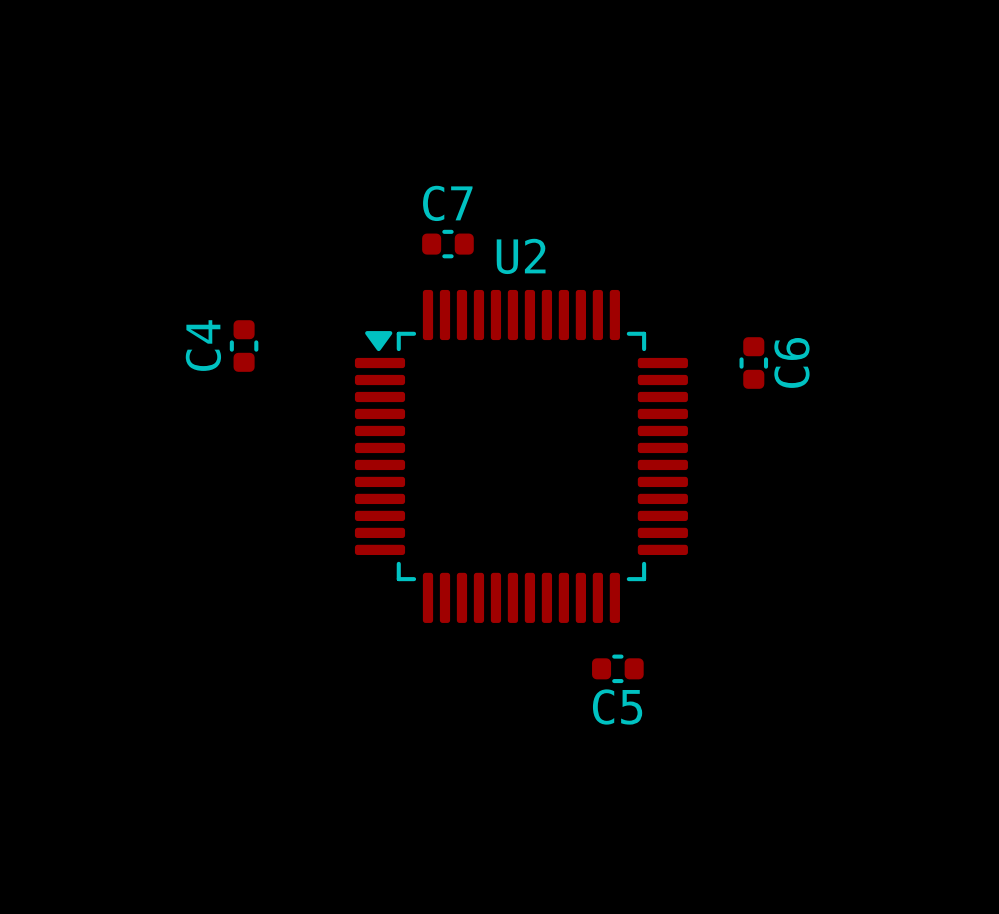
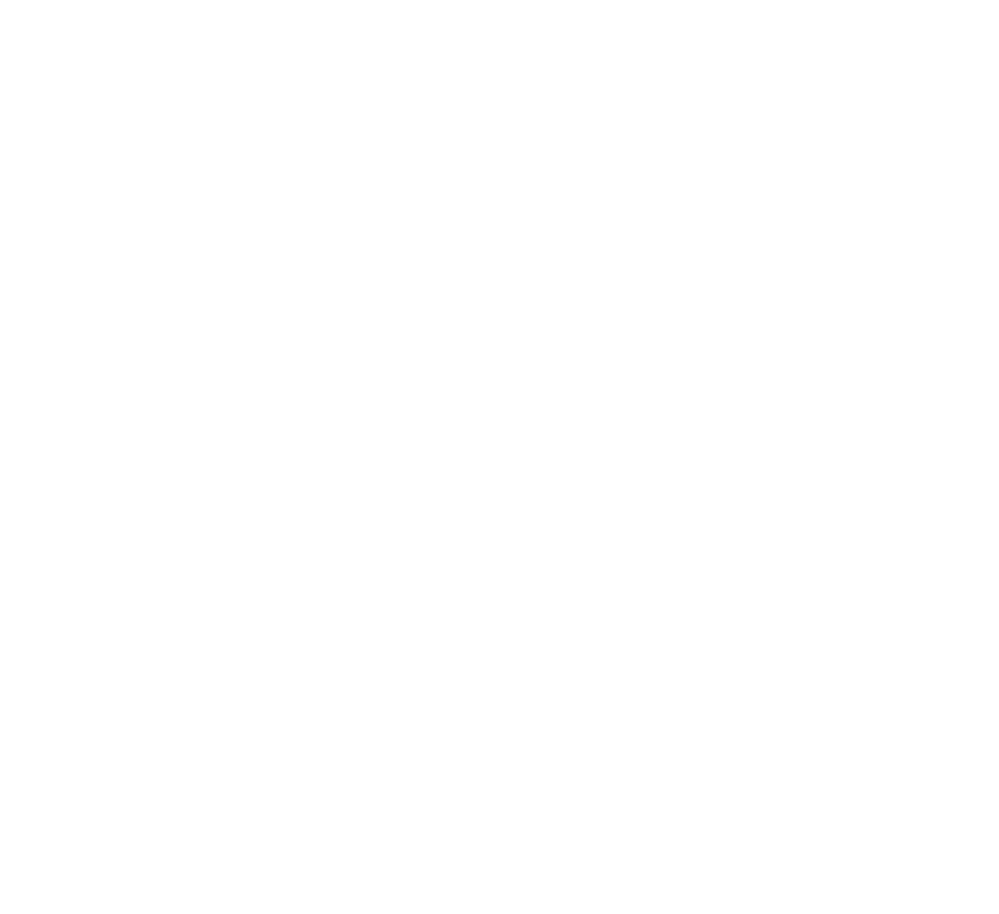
C7: (447, 244) -> none
C4: (244, 346) -> none
C6: (753, 363) -> none
U2: (521, 456) -> none
C5: (617, 668) -> none

